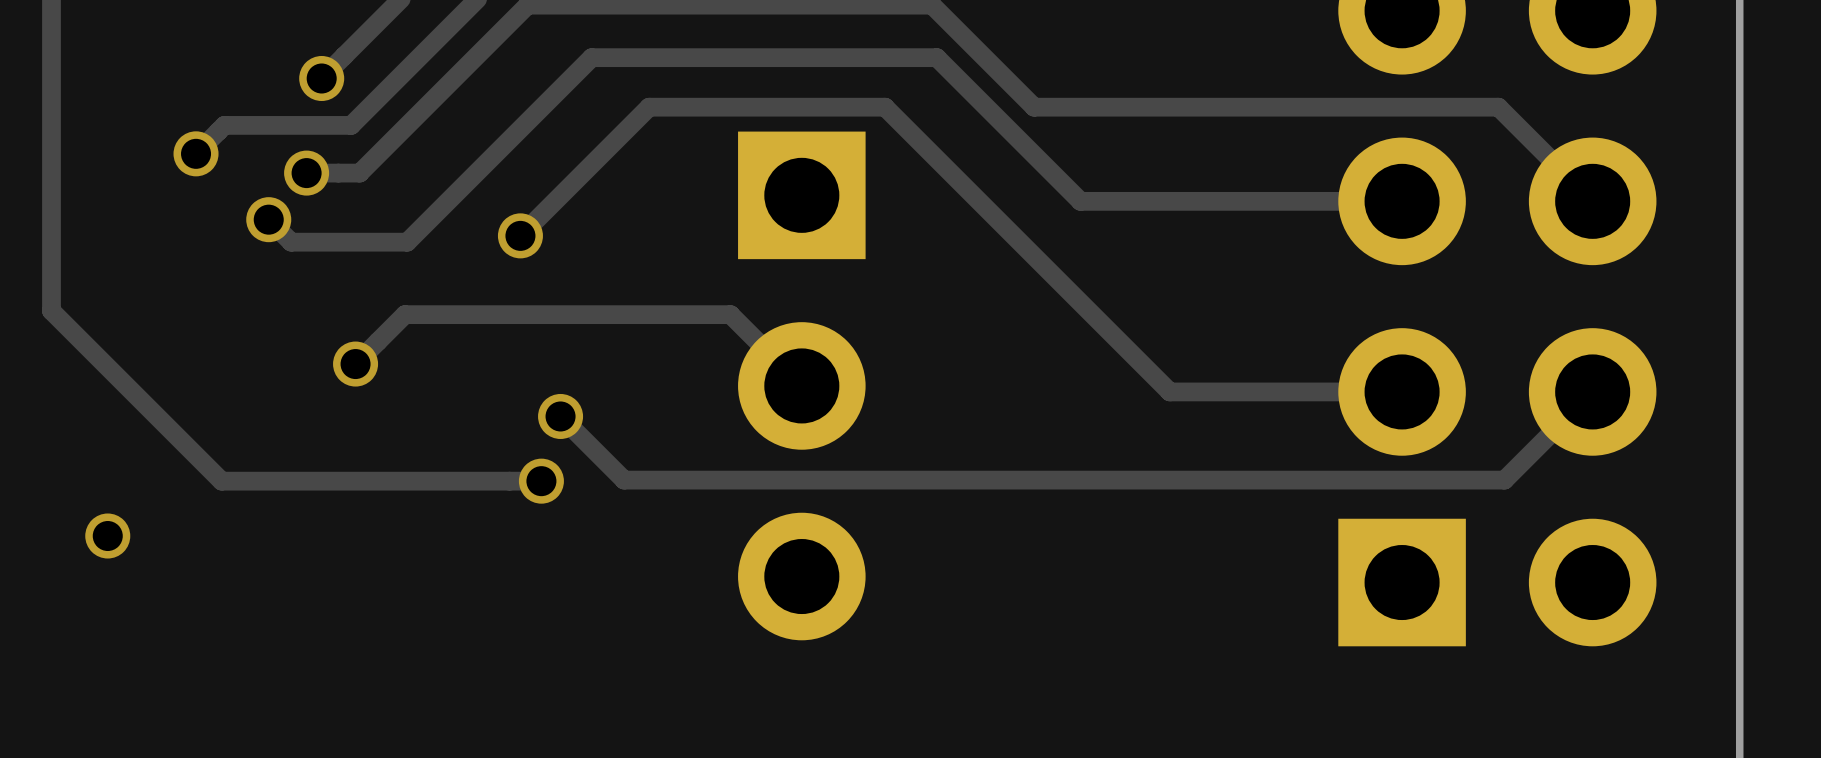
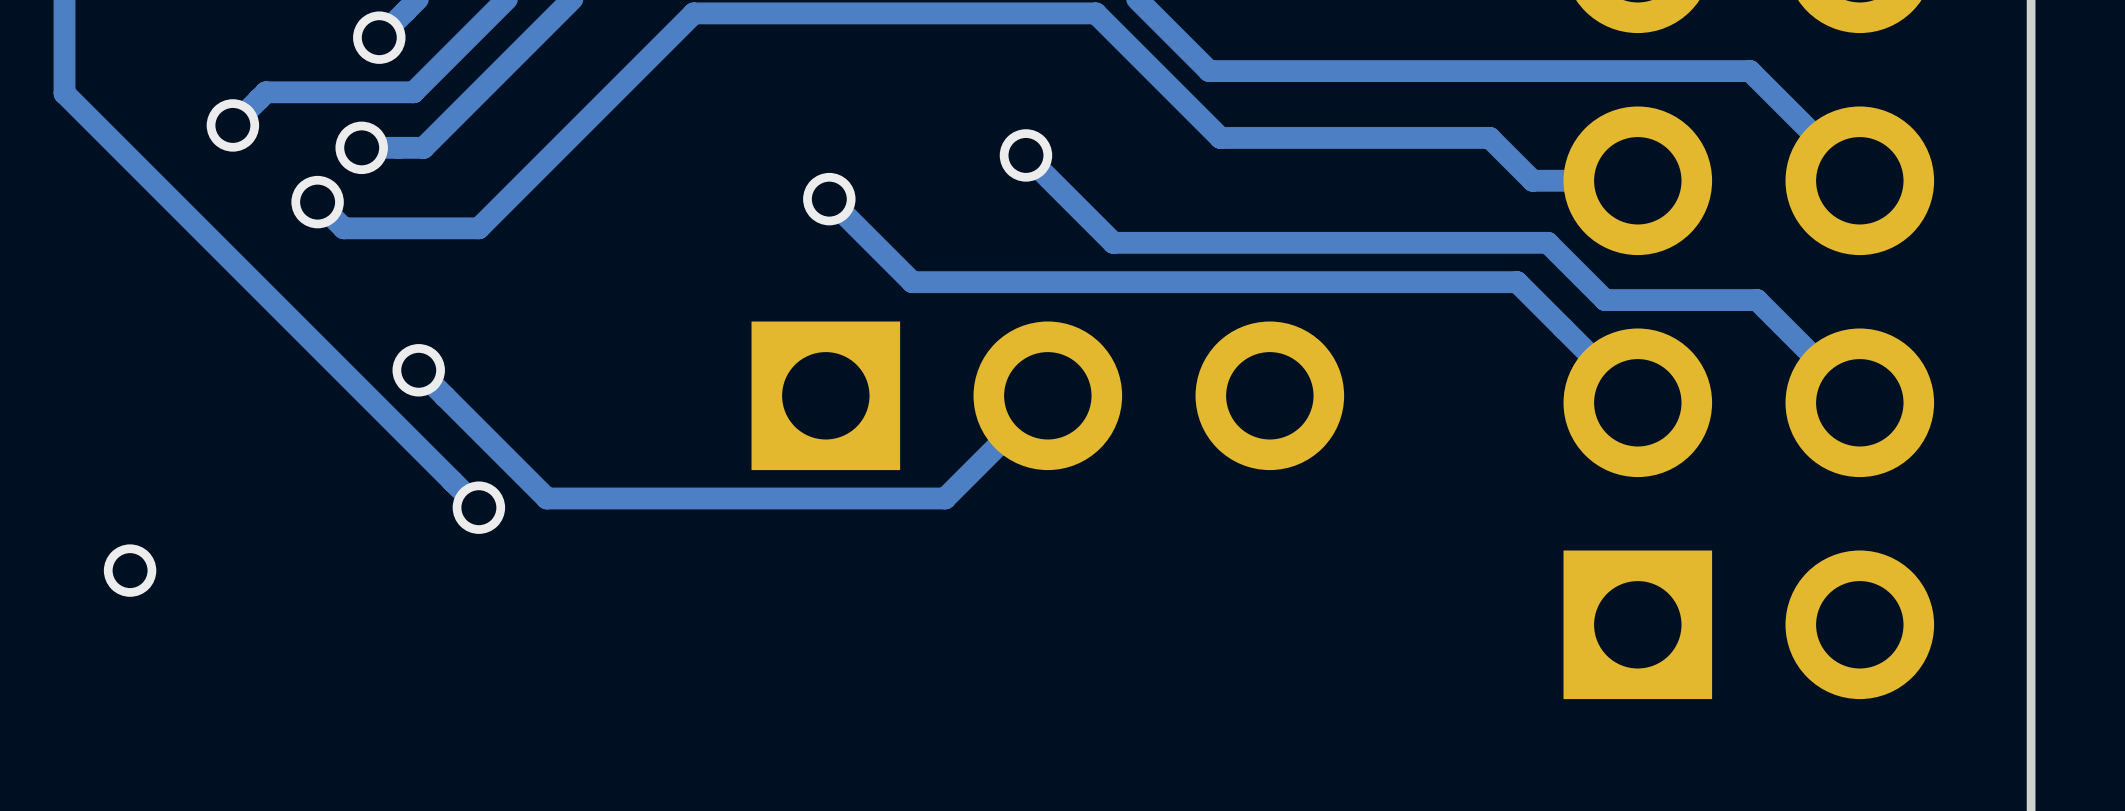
track: (51, 126) (51, 310) (221, 481) (541, 481) -> (64, 93) (478, 507)
track: (1043, 164) (1080, 201) (1311, 201) -> (1220, 137) (1489, 137) (1532, 180)
via: none -> (1025, 155)
via: none -> (829, 199)
track: (520, 235) (649, 107) (885, 107) (1169, 391) (1402, 391) -> (829, 199) (912, 282) (1517, 282) (1637, 402)
via: (520, 235) -> none
track: (355, 364) (404, 314) (730, 314) (801, 385) -> (418, 370) (546, 498) (945, 498) (1047, 395)
part rotation: 0° (801, 385) -> 90° counterclockwise (1047, 395)
track: (1592, 391) (1504, 480) (624, 480) (560, 416) -> (1859, 402) (1757, 300) (1605, 300) (1547, 242) (1113, 242) (1025, 155)
via: (560, 416) -> none
via: (541, 481) -> none
via: none -> (478, 507)

